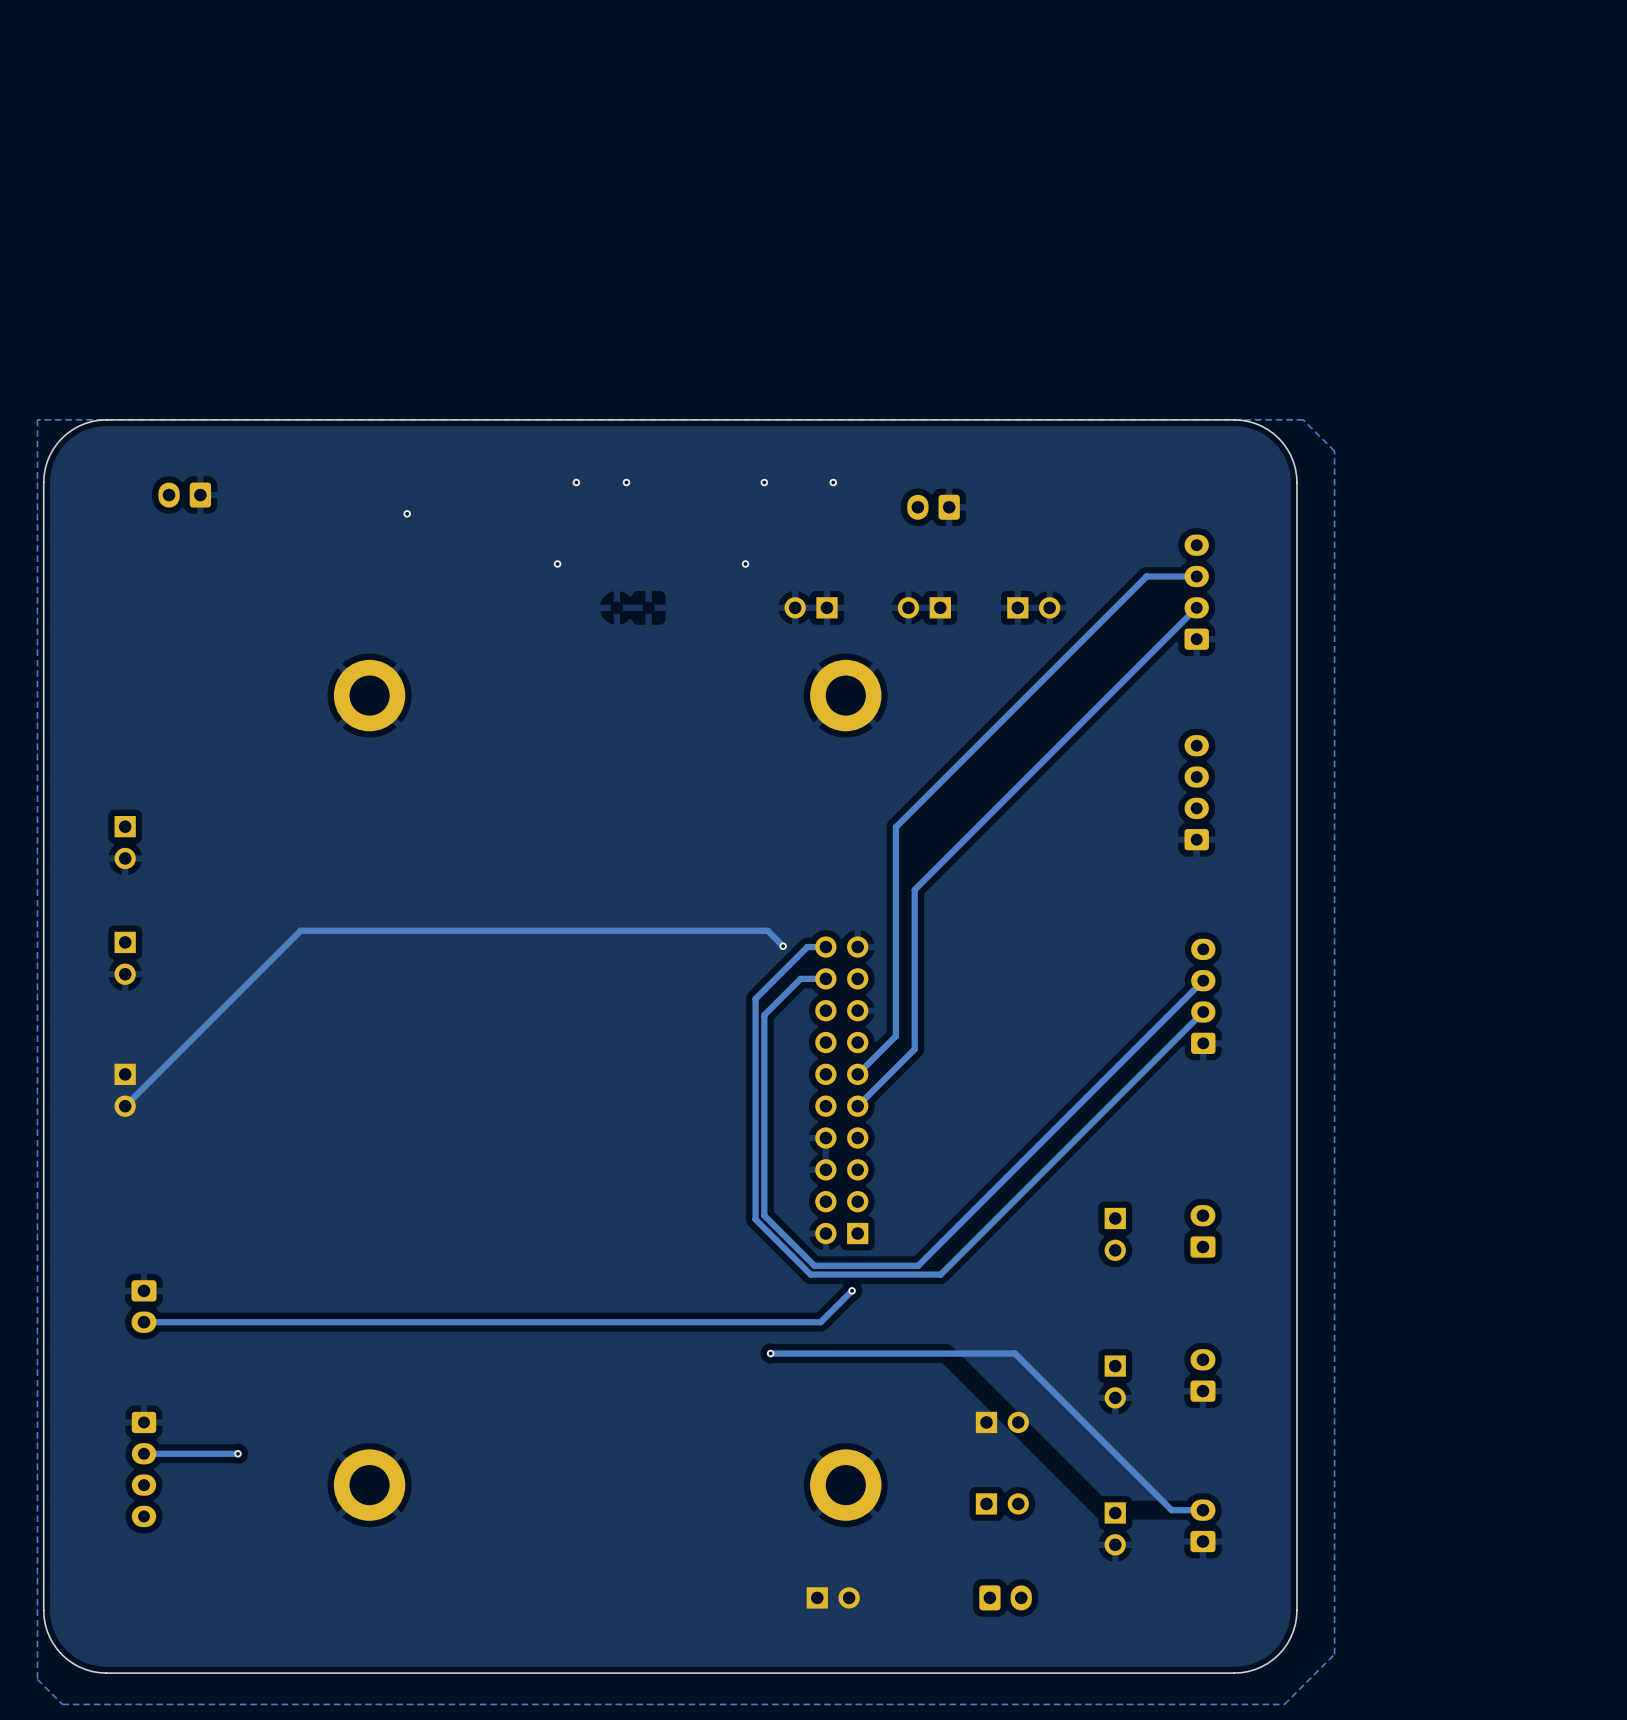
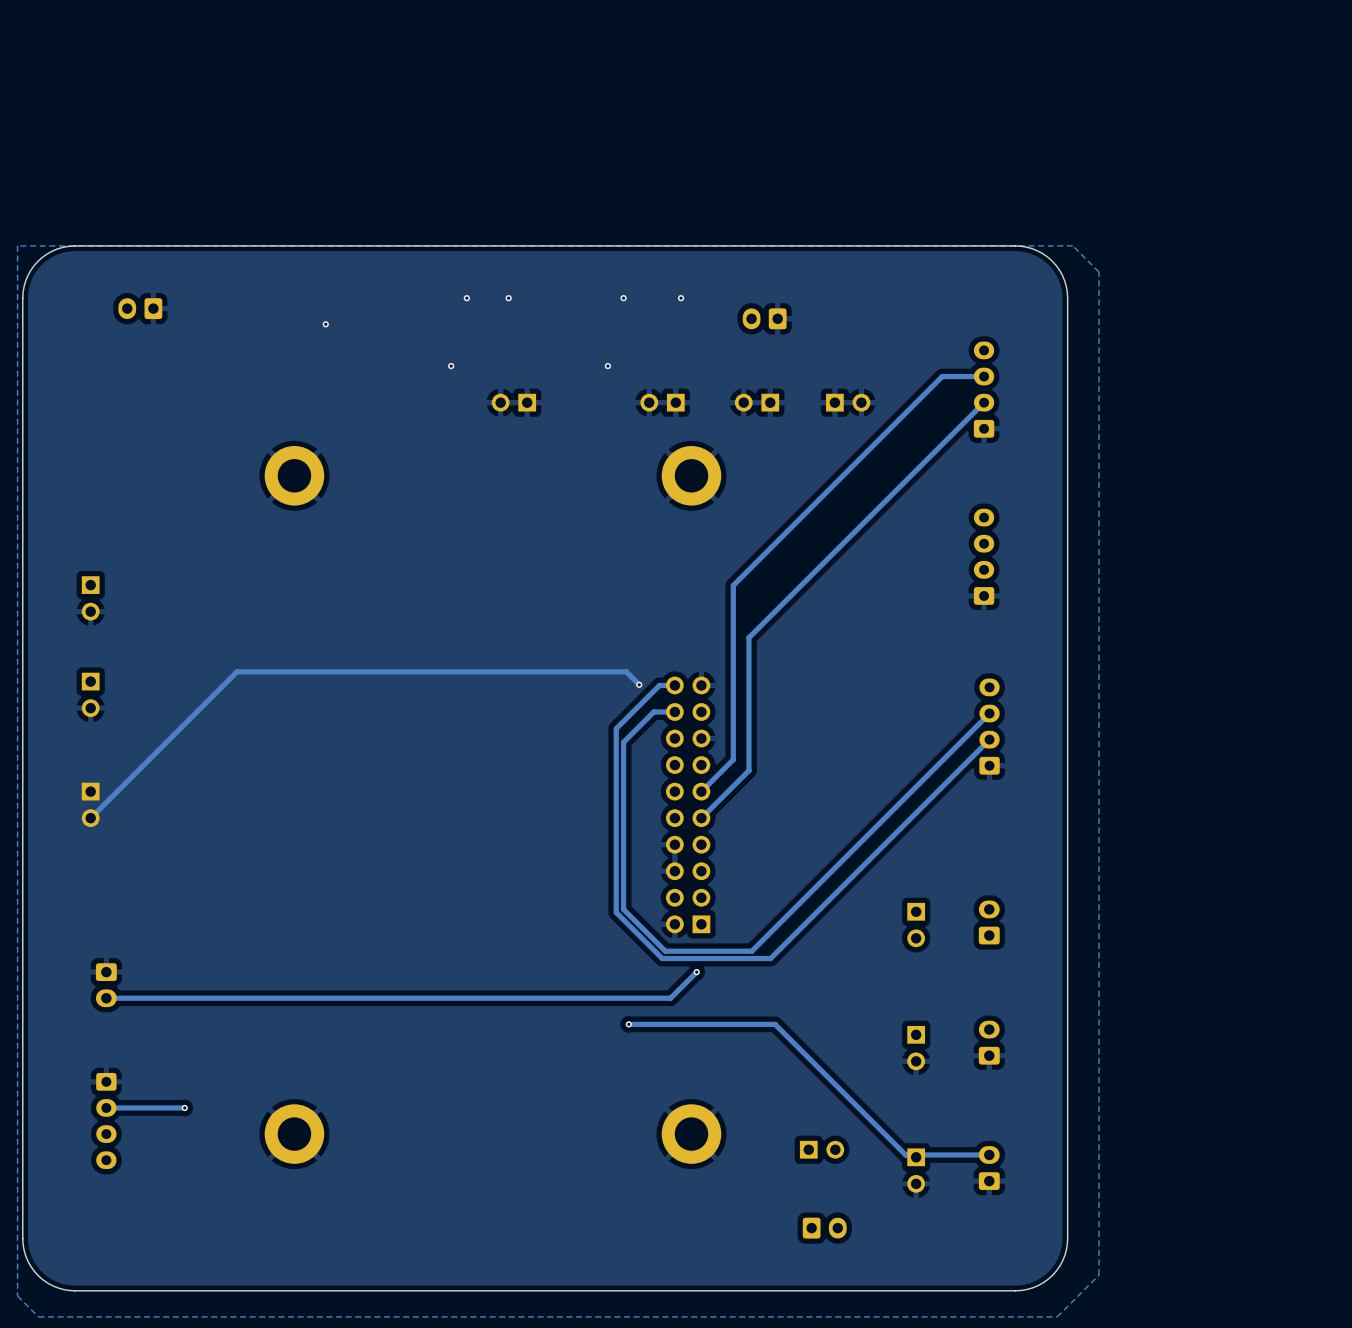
part: none -> (513, 402)
track: (946, 1353) (1014, 1353) (1171, 1510) -> (775, 1024) (905, 1154) (963, 1154)
part: (1002, 1422) -> none
part: (833, 1597) -> none

